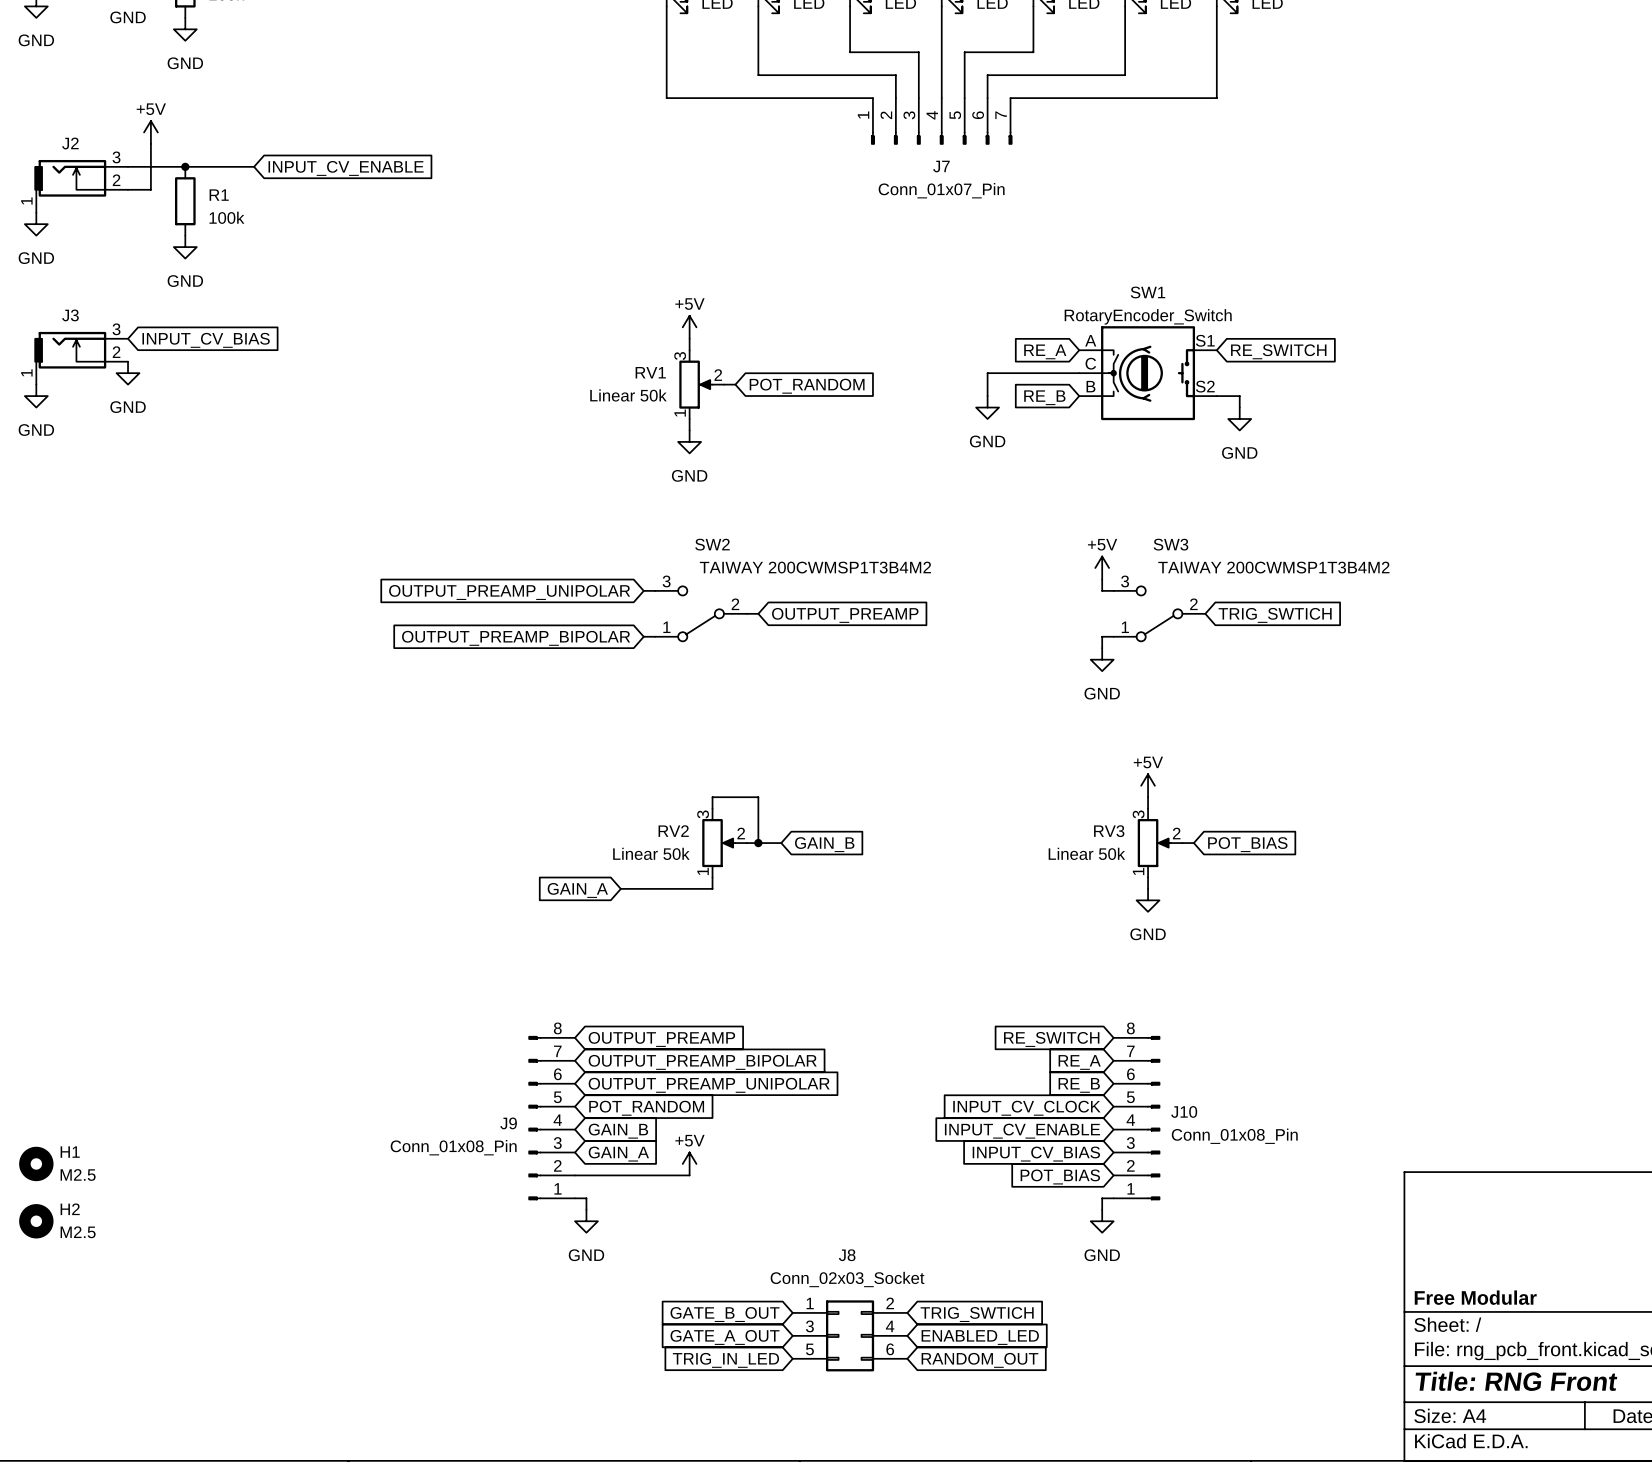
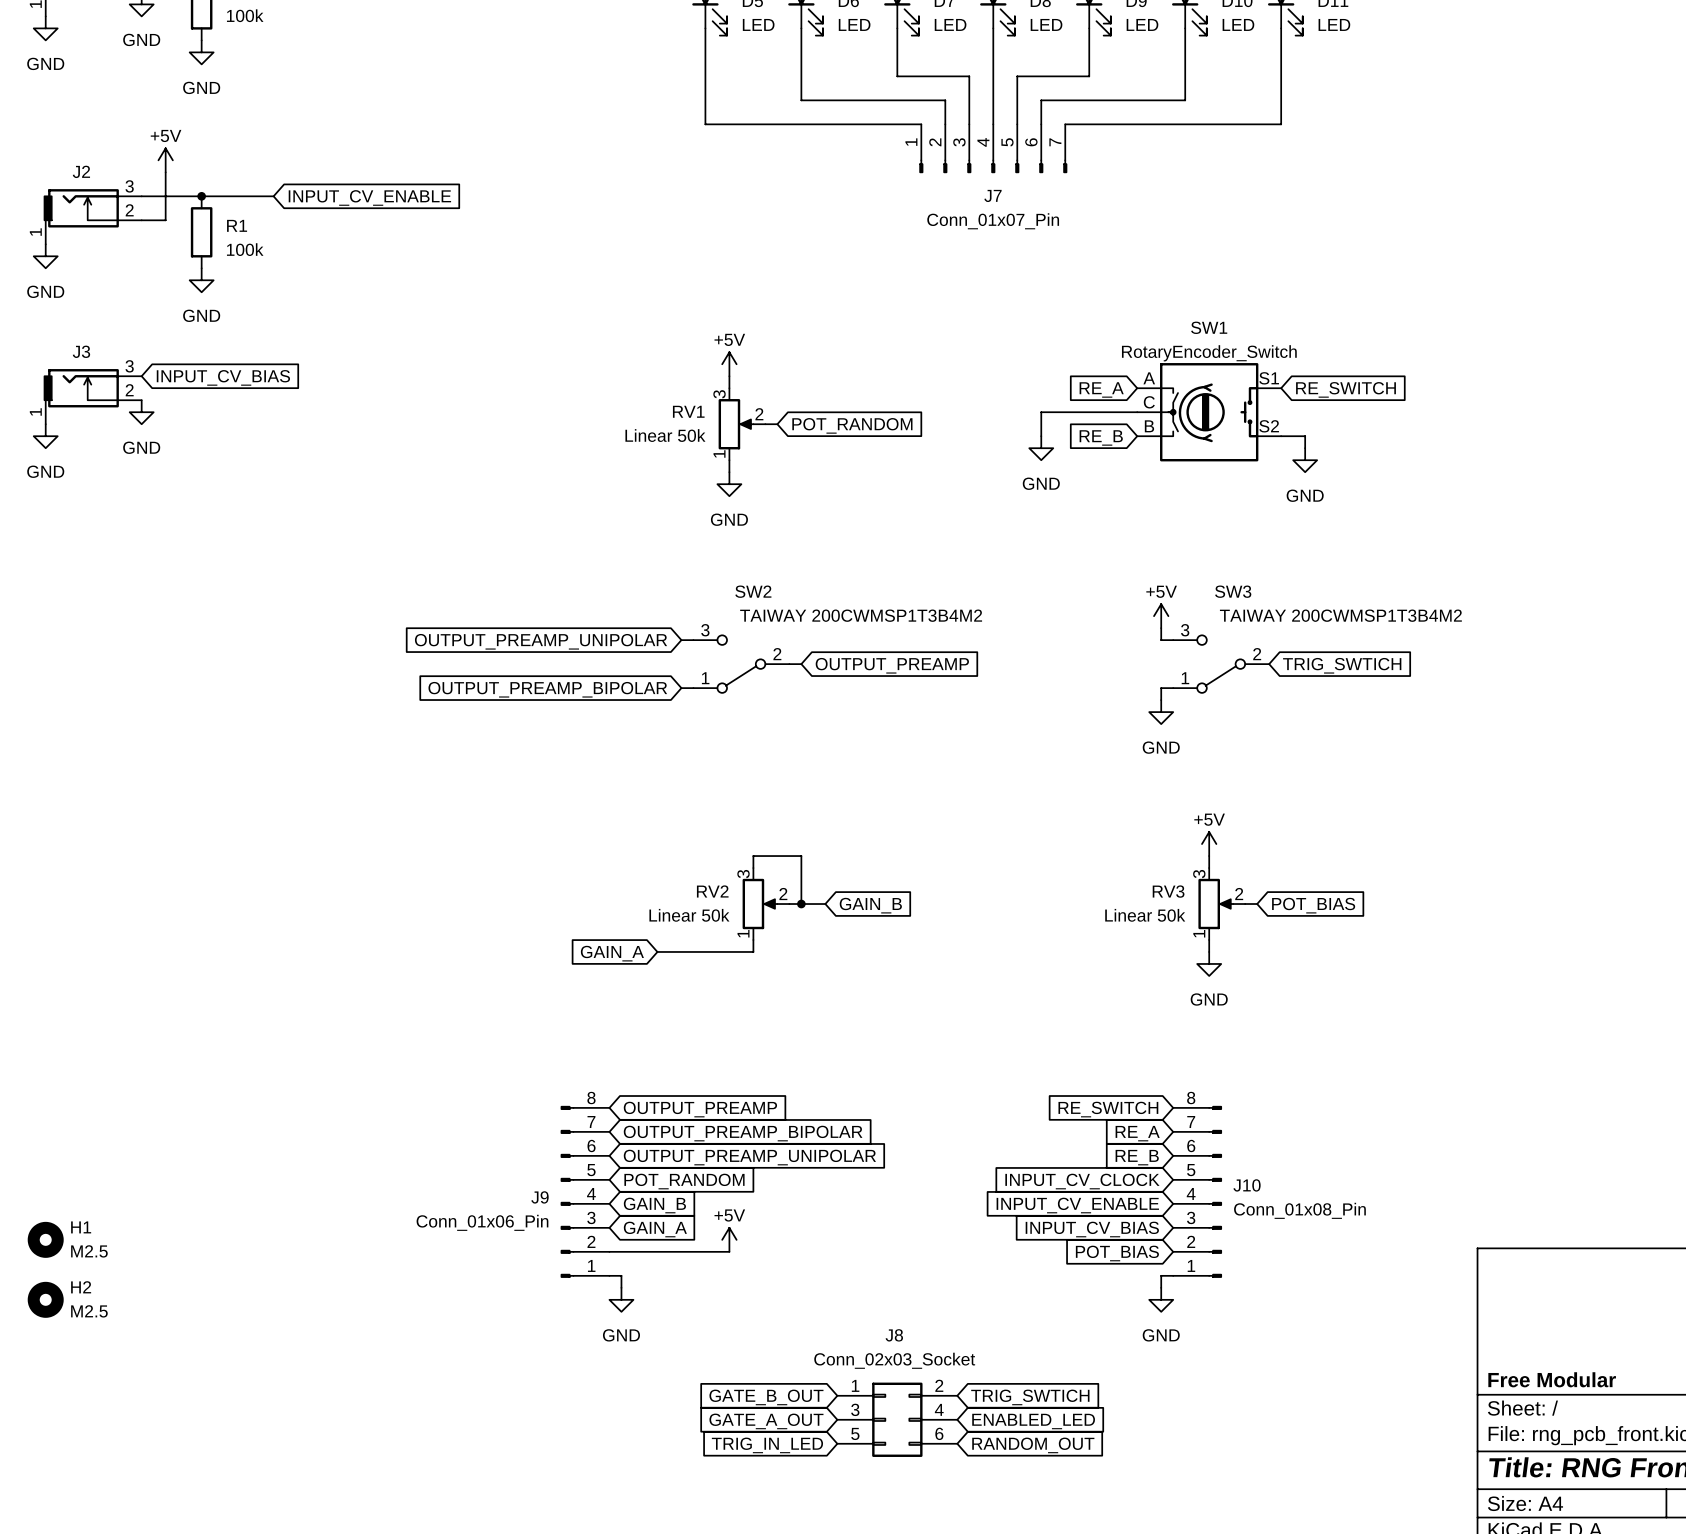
J9 value: Conn_01x08_Pin (453, 1147) -> Conn_01x06_Pin (482, 1222)

